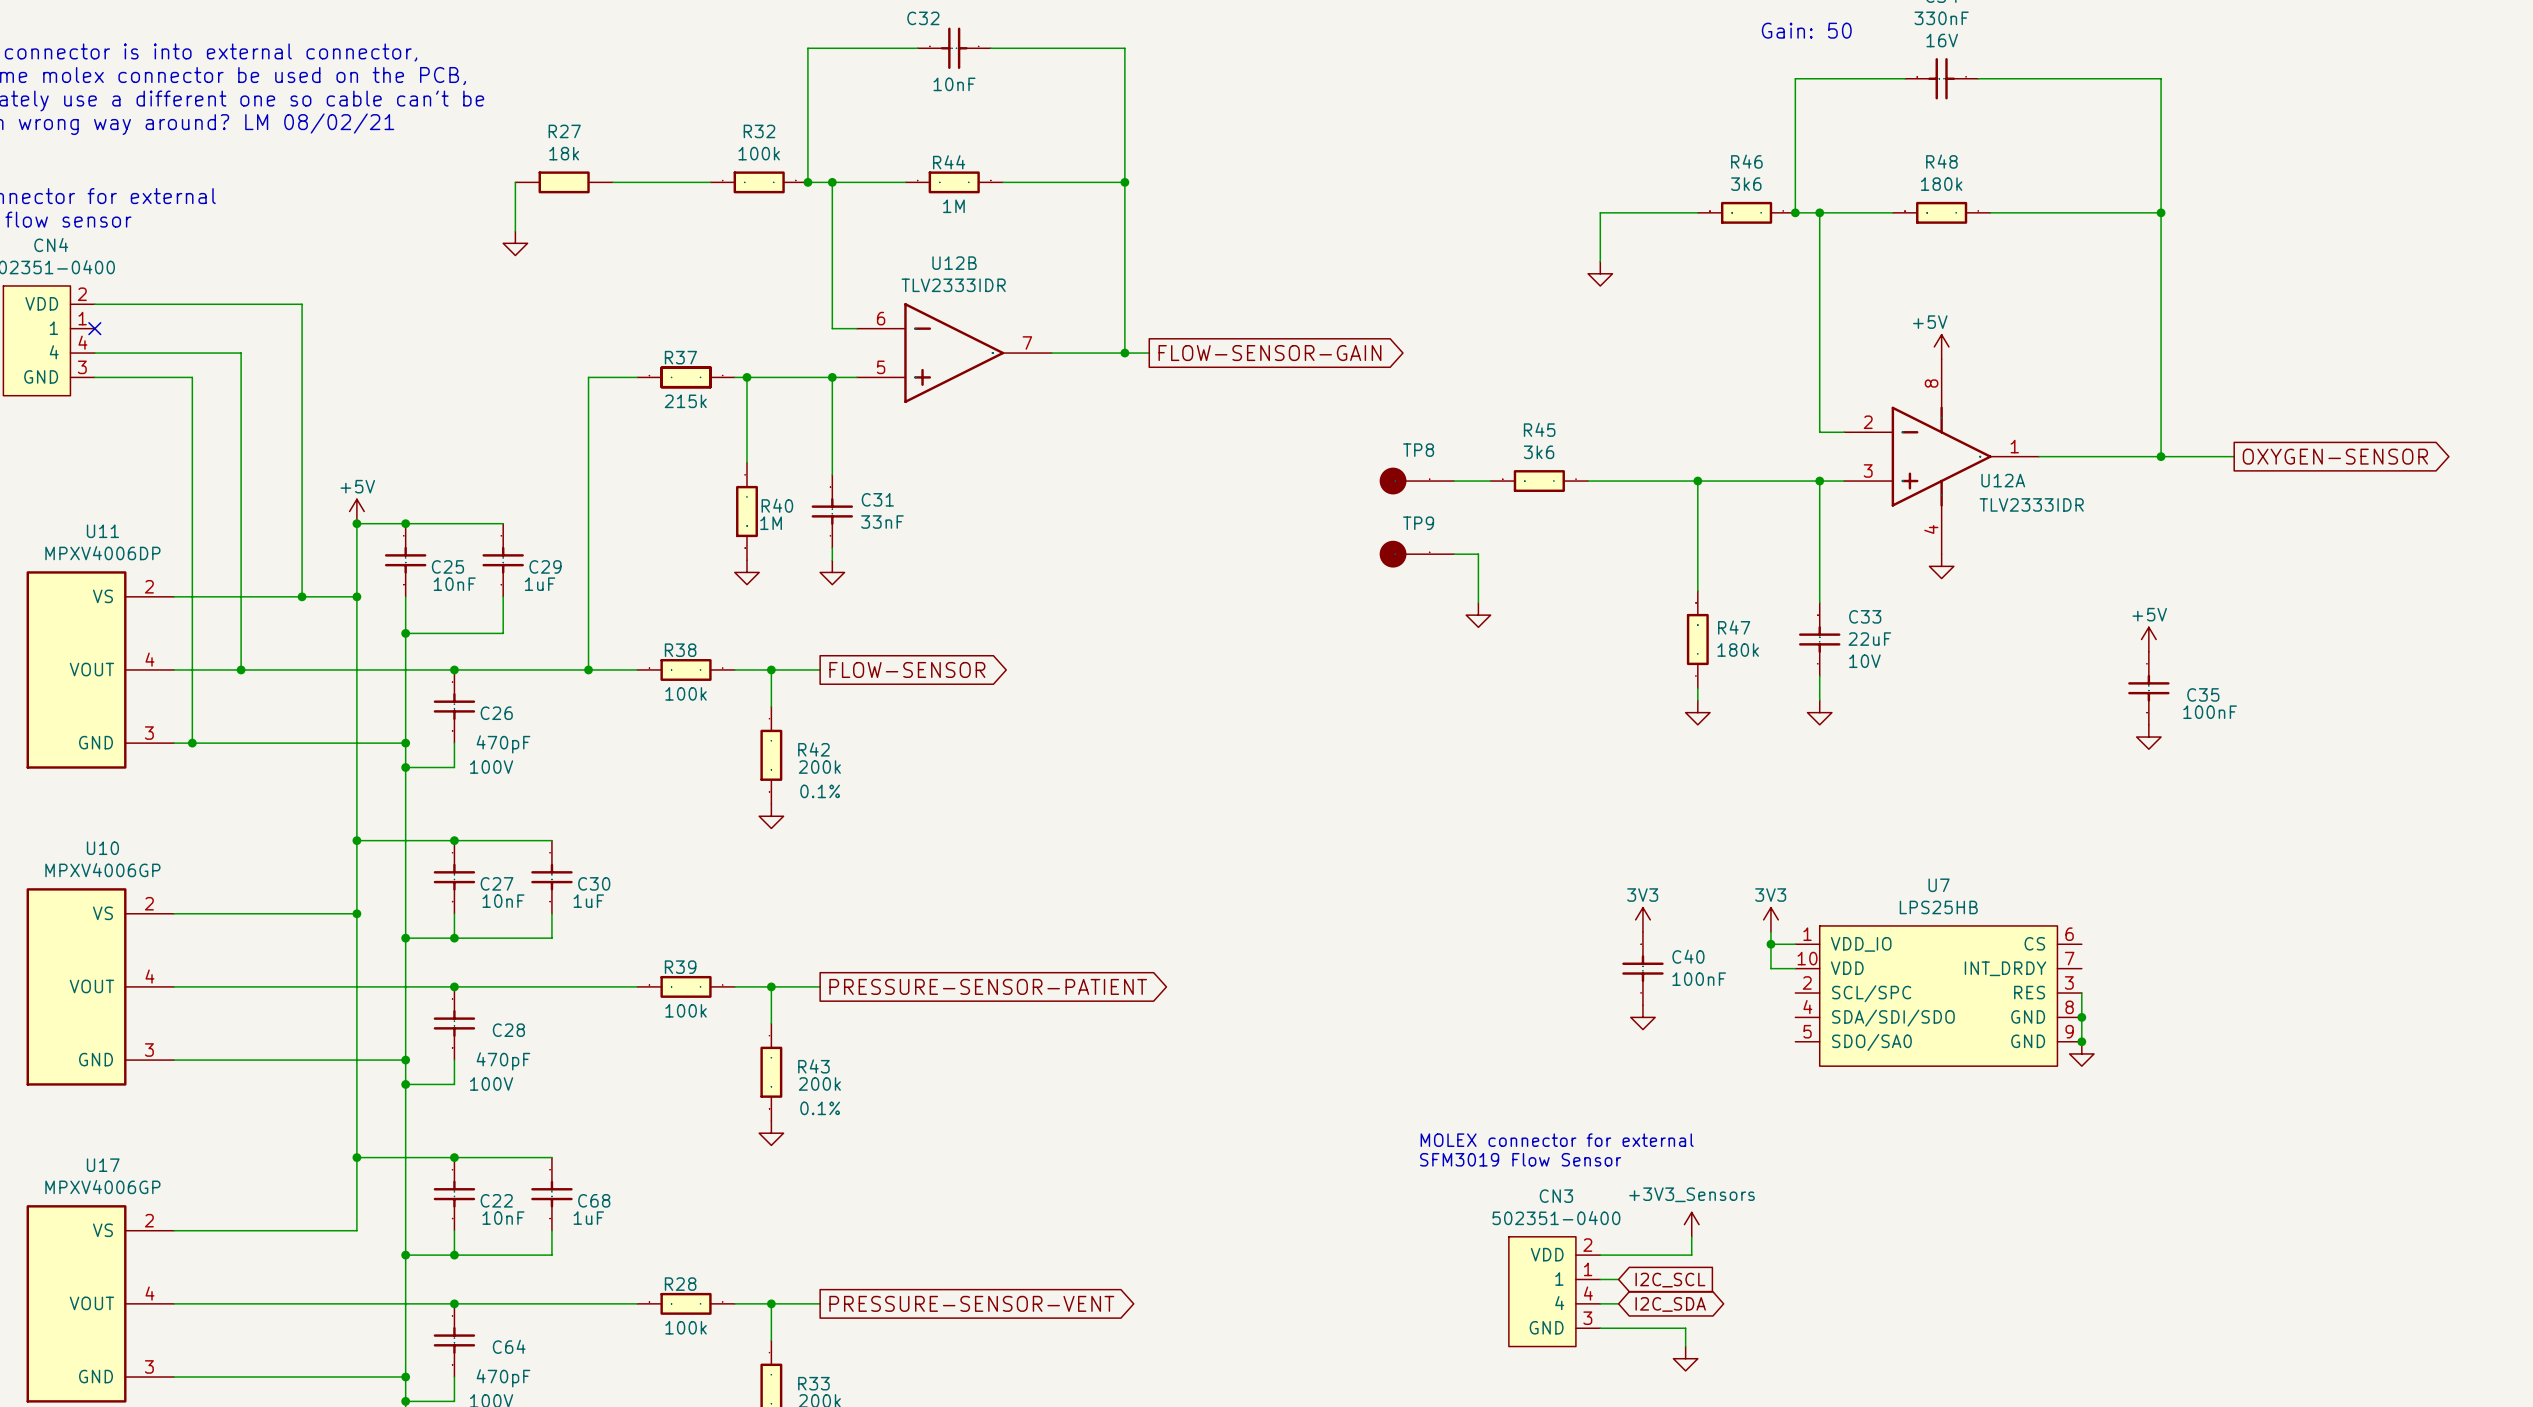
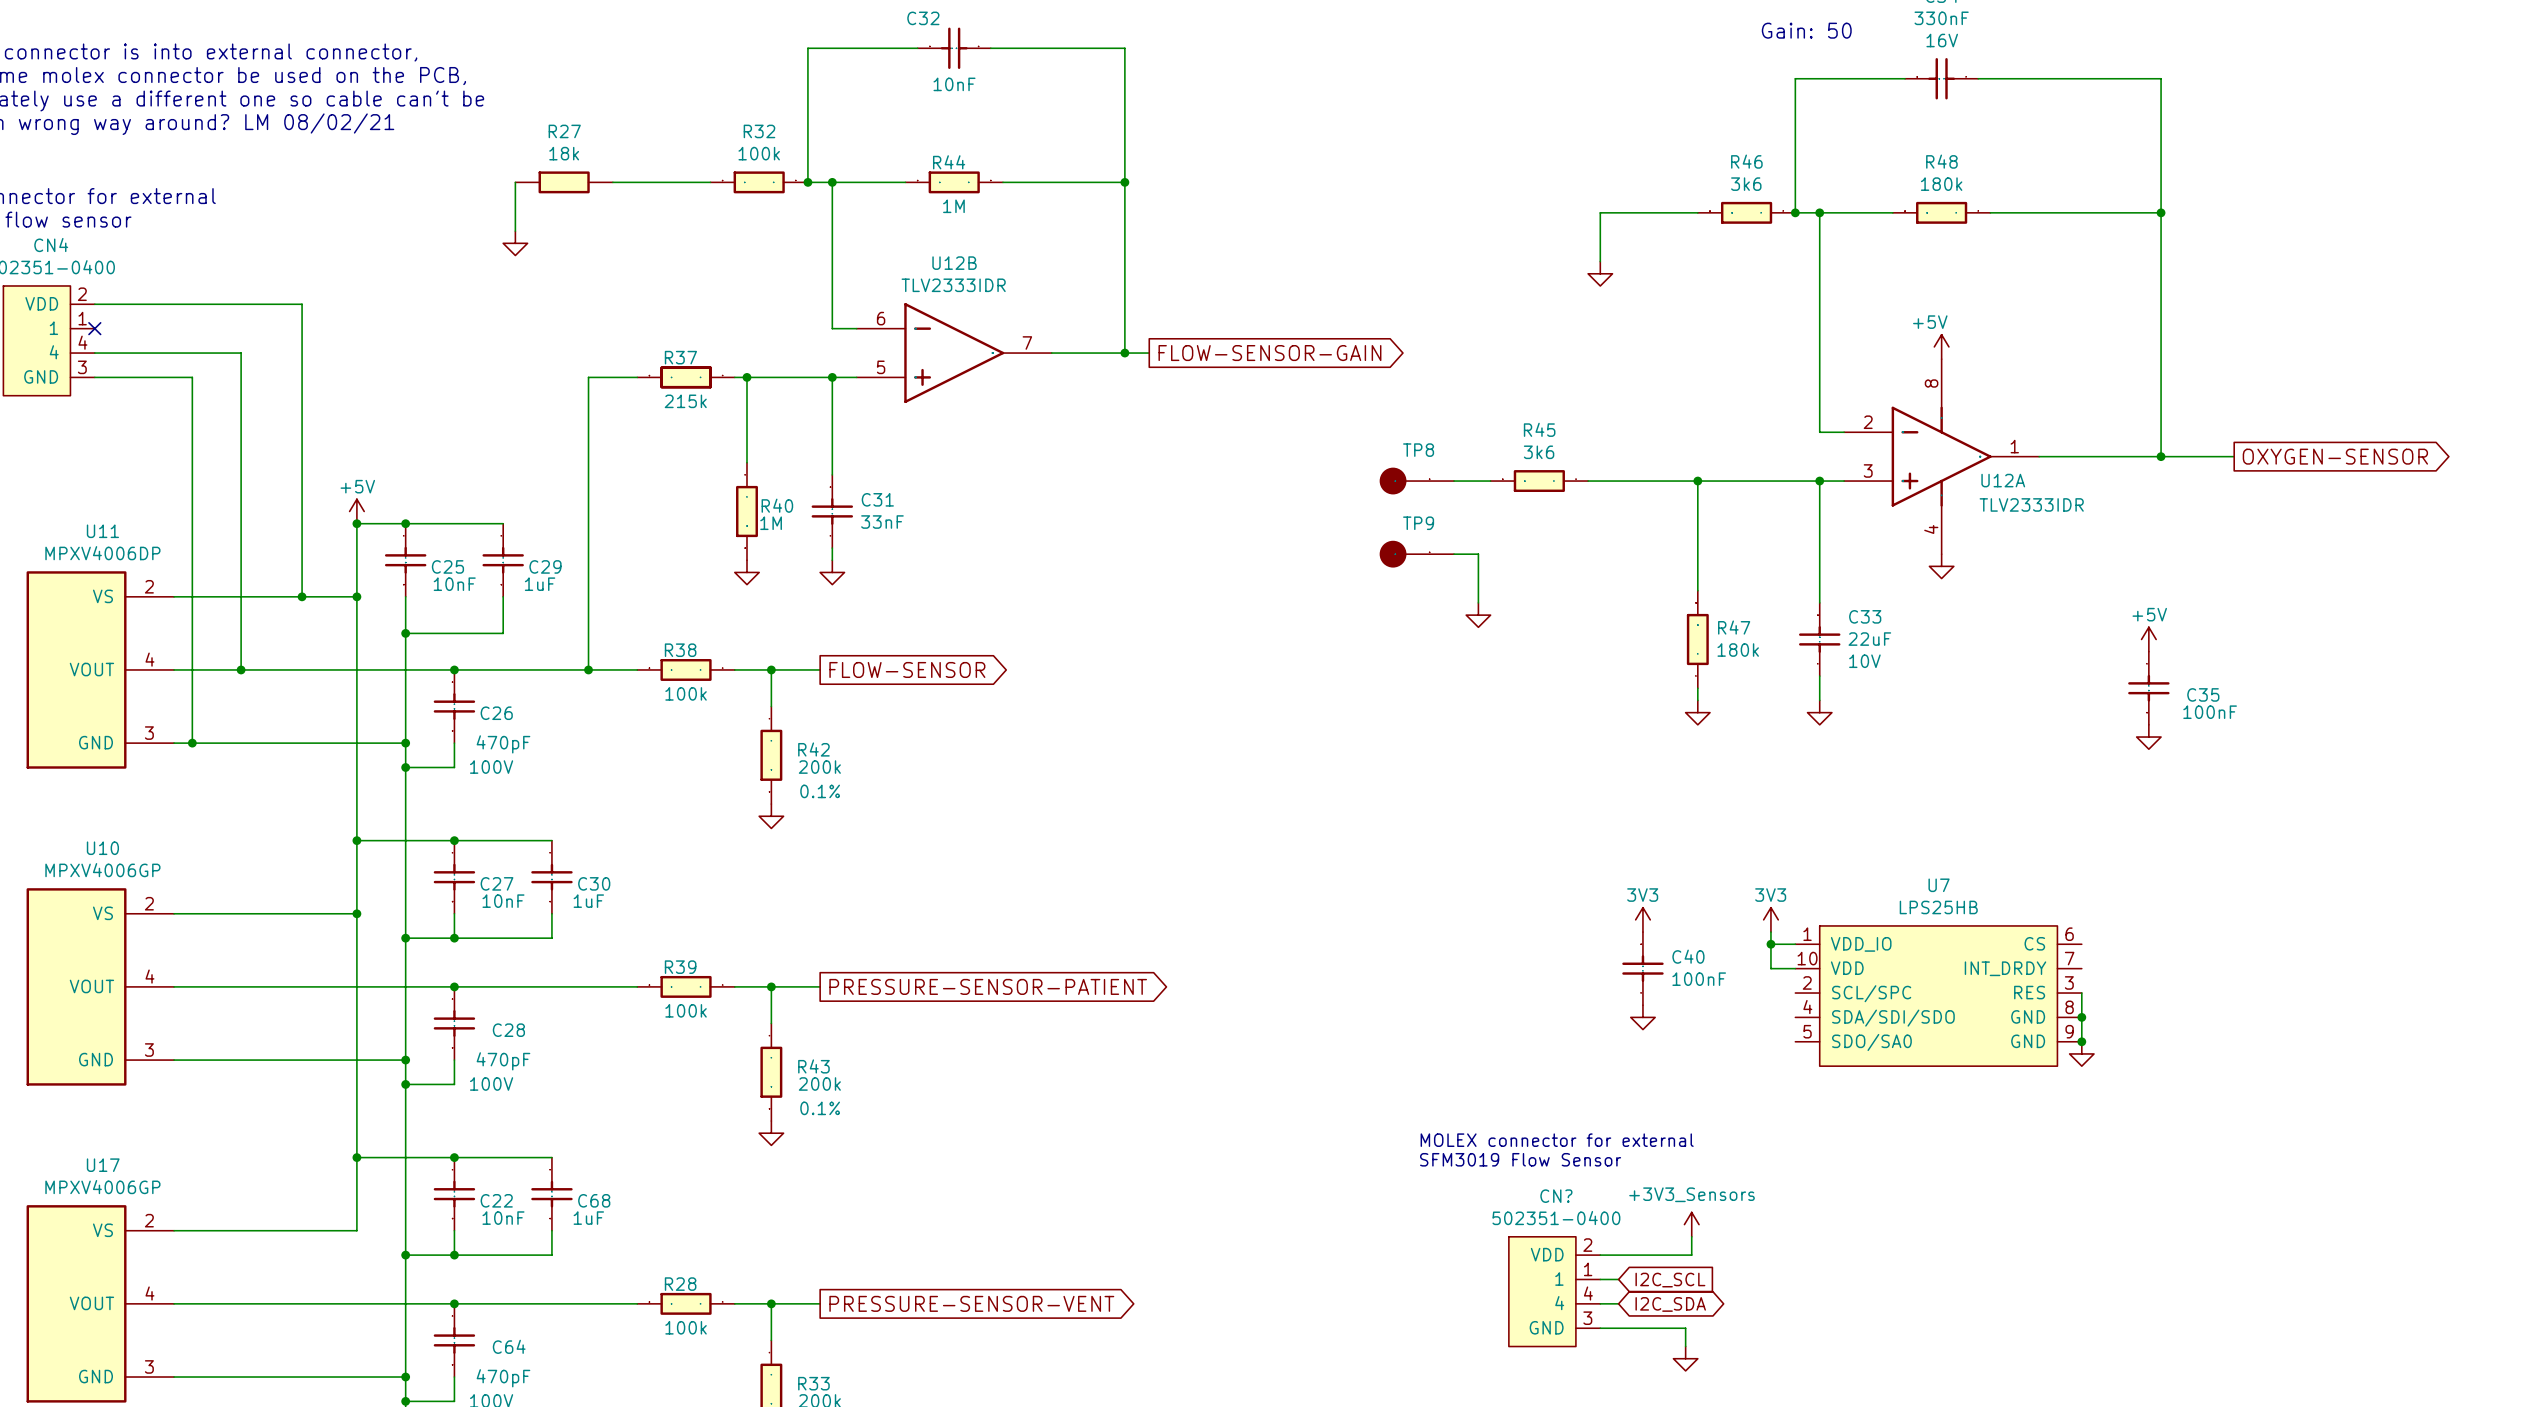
CN3 name: CN3 (1556, 1196) -> CN? (1556, 1196)

